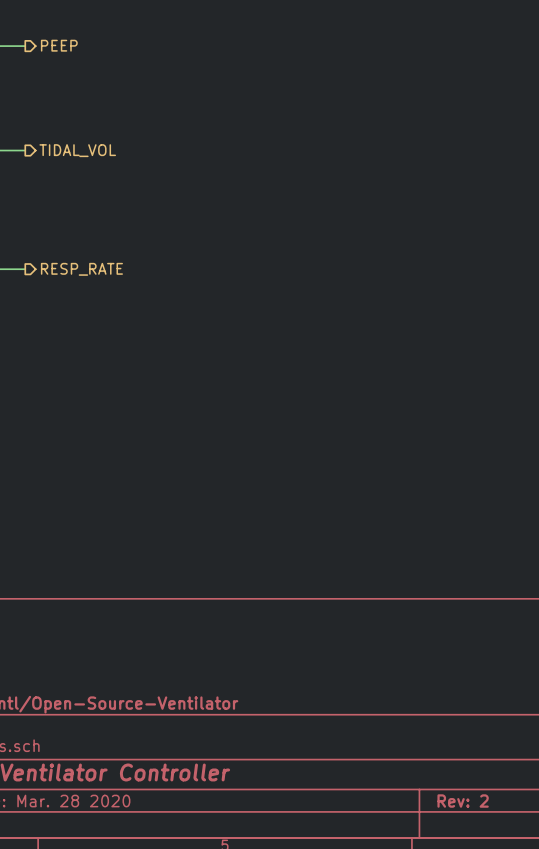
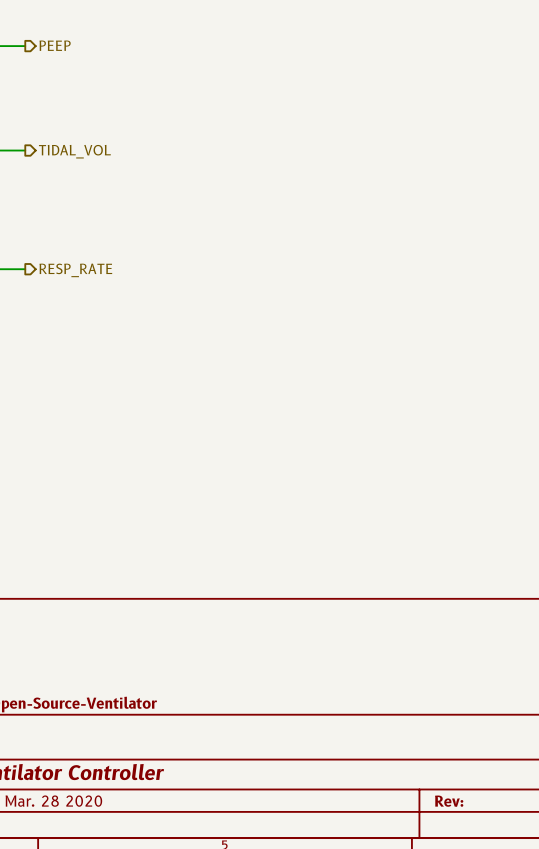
title block: Rev: 2 (463, 801) -> Rev: (449, 801)

